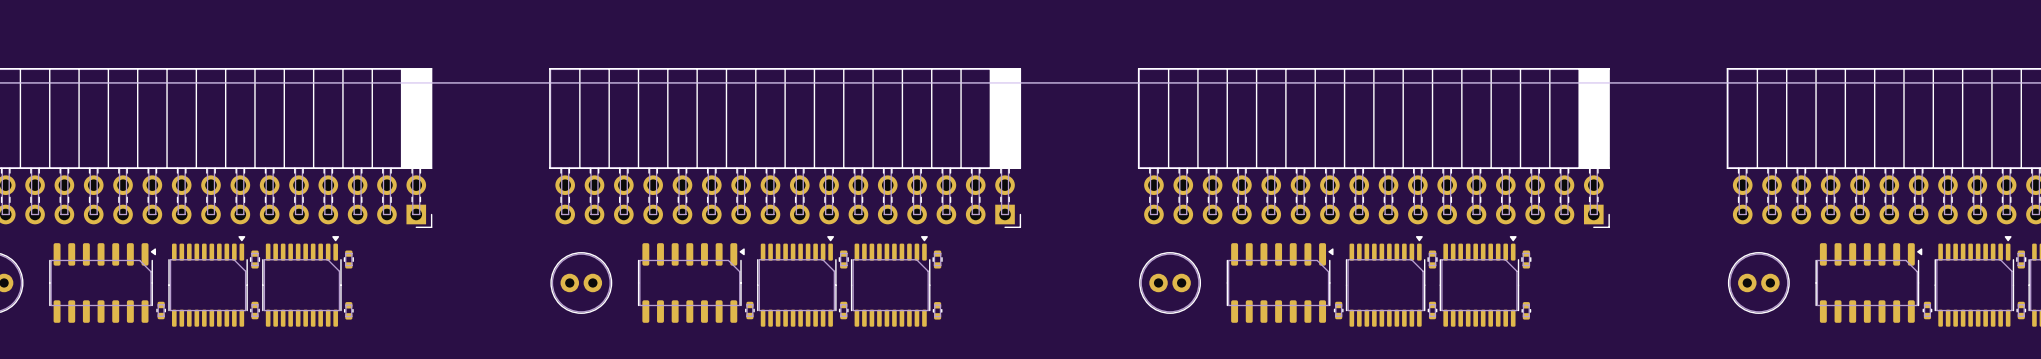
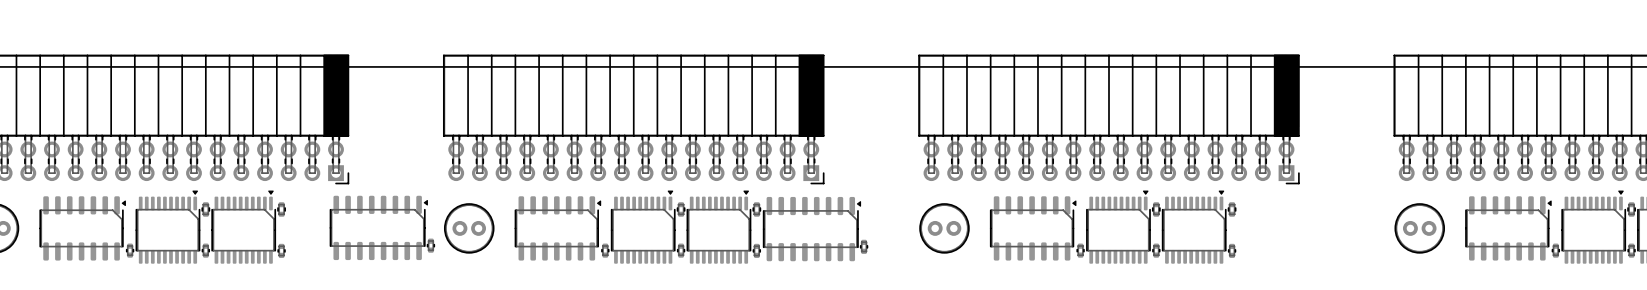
part: none -> (378, 227)
part: none -> (812, 229)
part: none -> (430, 245)
part: none -> (864, 246)

